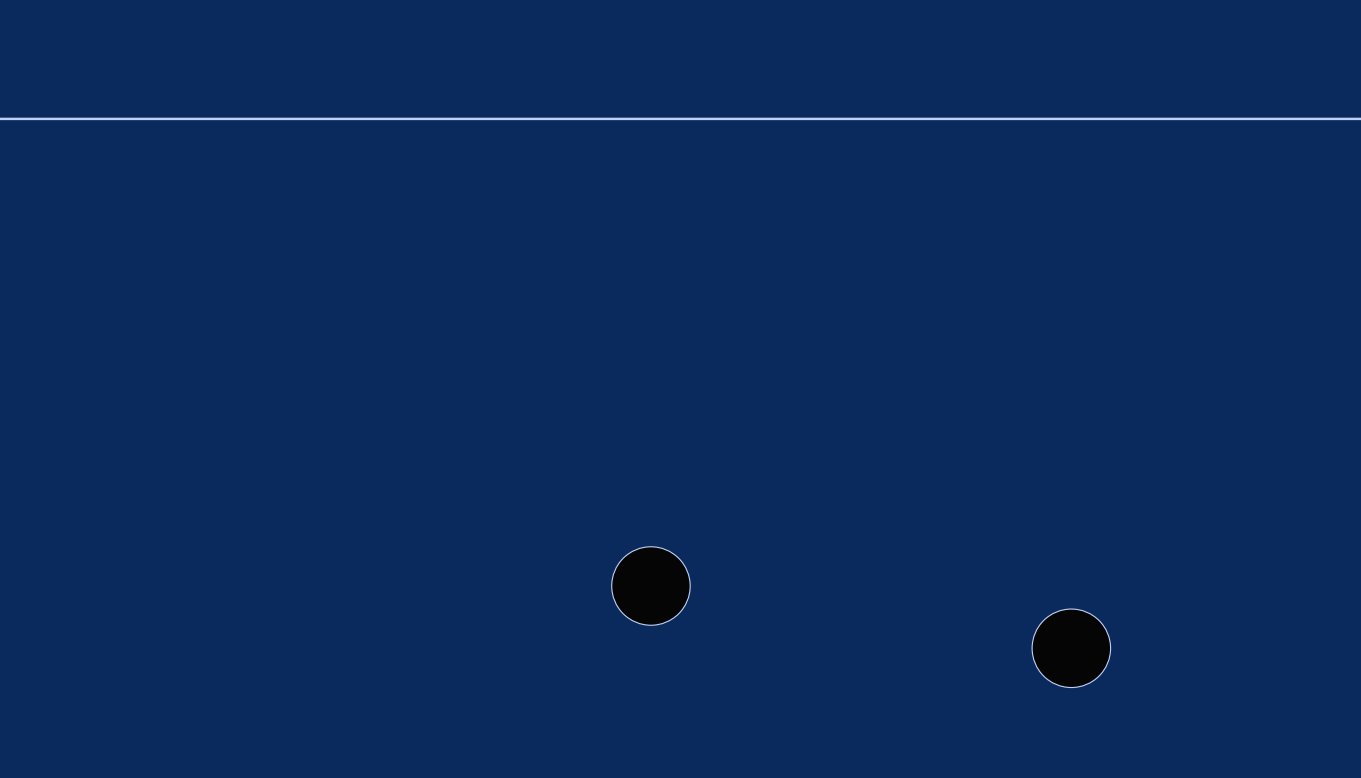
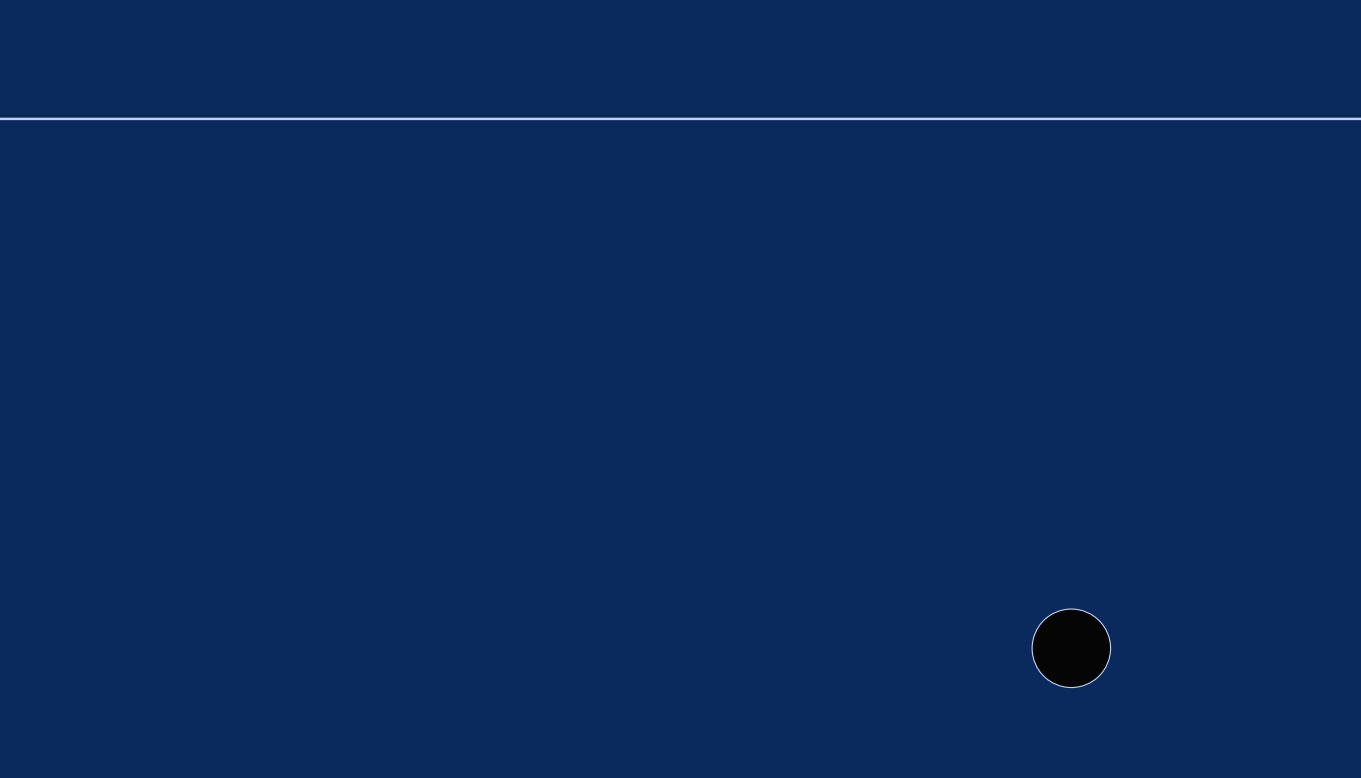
part: (650, 586) -> none

